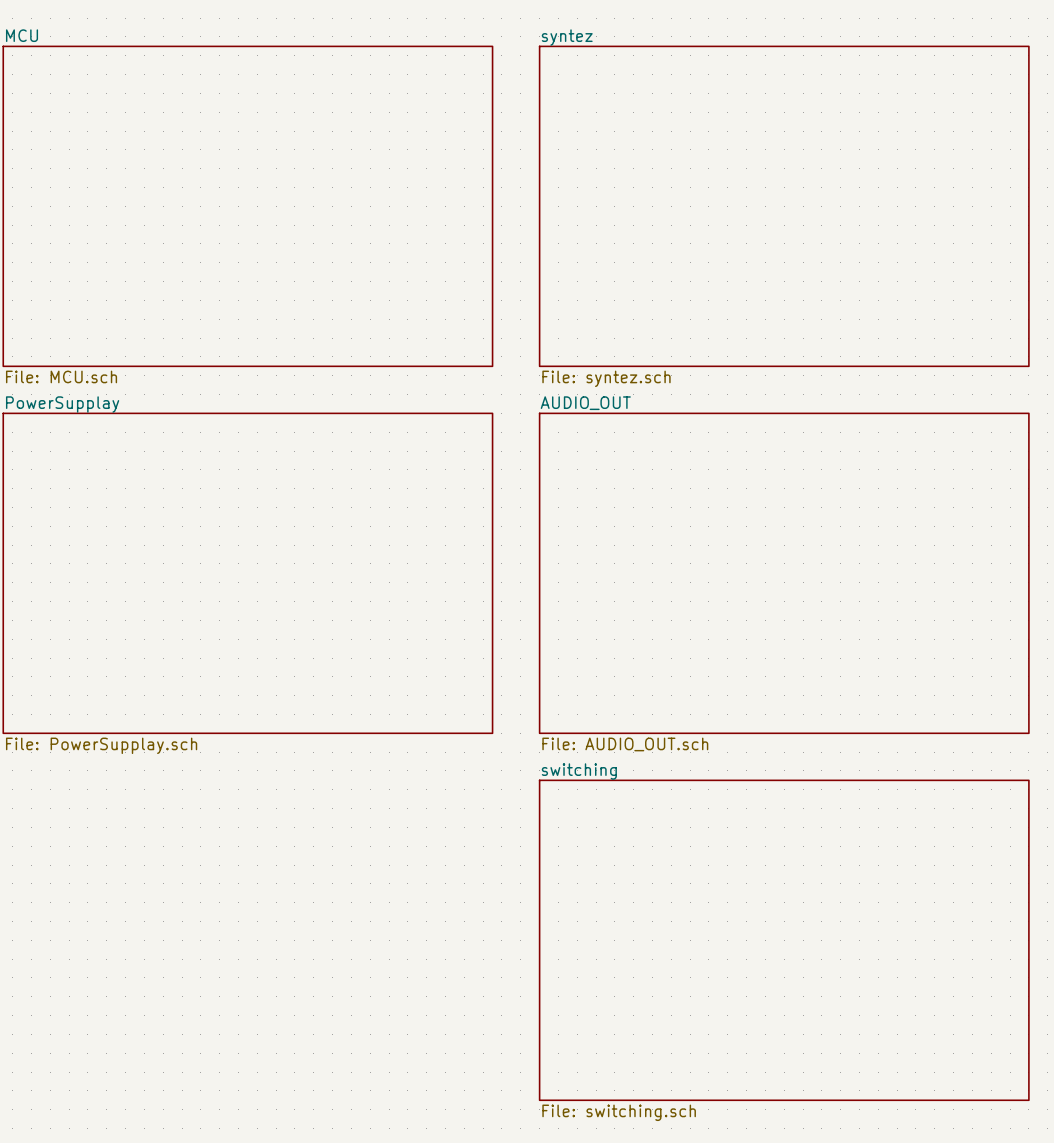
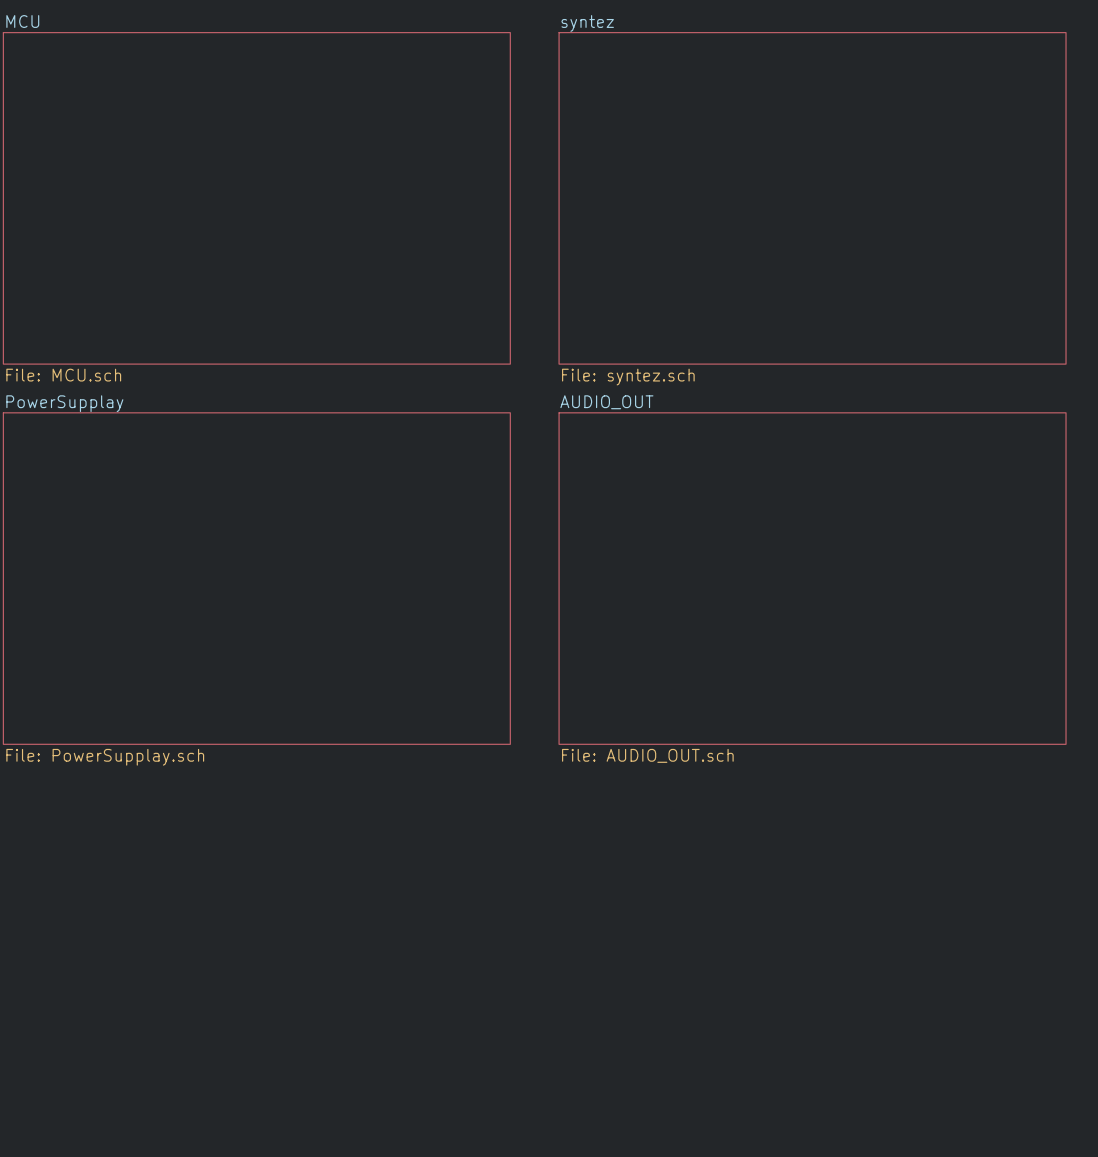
sheet switching: File: switching.sch (784, 940) -> none

